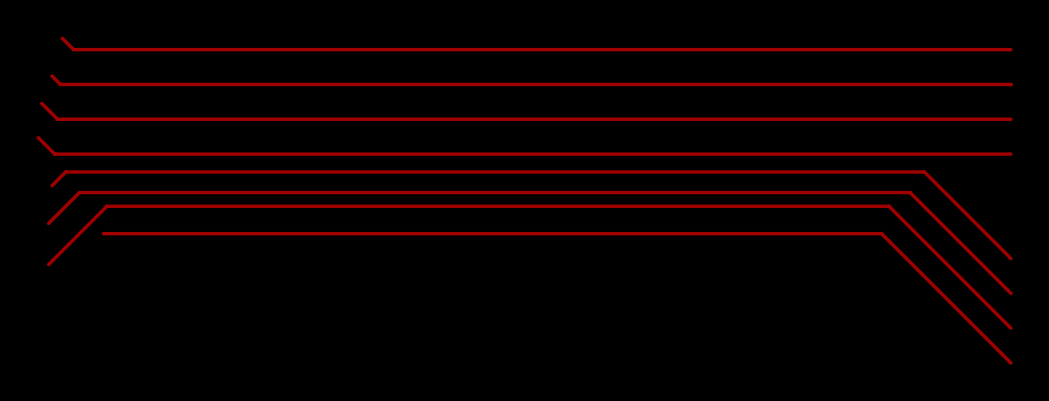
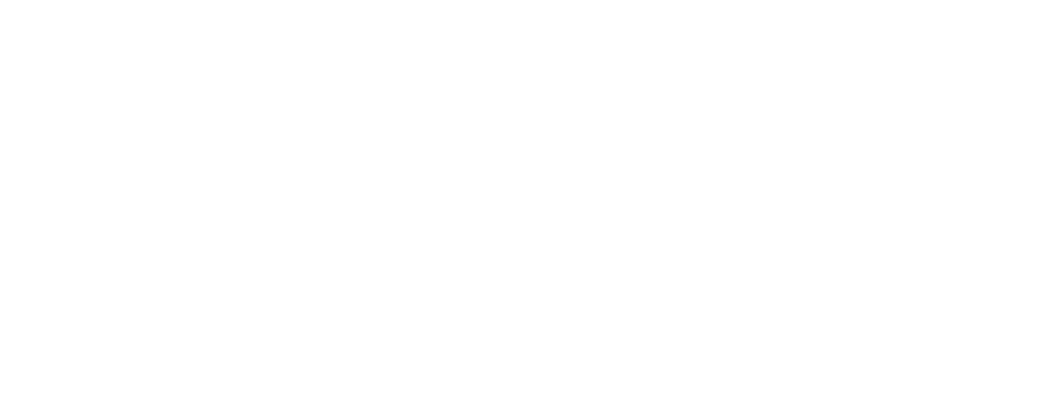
track: (62, 38) (73, 49) (1010, 49) -> none
track: (52, 76) (60, 84) (1010, 84) -> none
track: (41, 103) (57, 119) (1010, 119) -> none
track: (38, 137) (54, 154) (1010, 154) -> none
track: (52, 185) (65, 171) (924, 171) (1010, 258) -> none
track: (48, 223) (79, 192) (910, 192) (1010, 293) -> none
track: (103, 233) (881, 233) (1010, 363) -> none
track: (48, 264) (106, 206) (889, 206) (1010, 328) -> none

